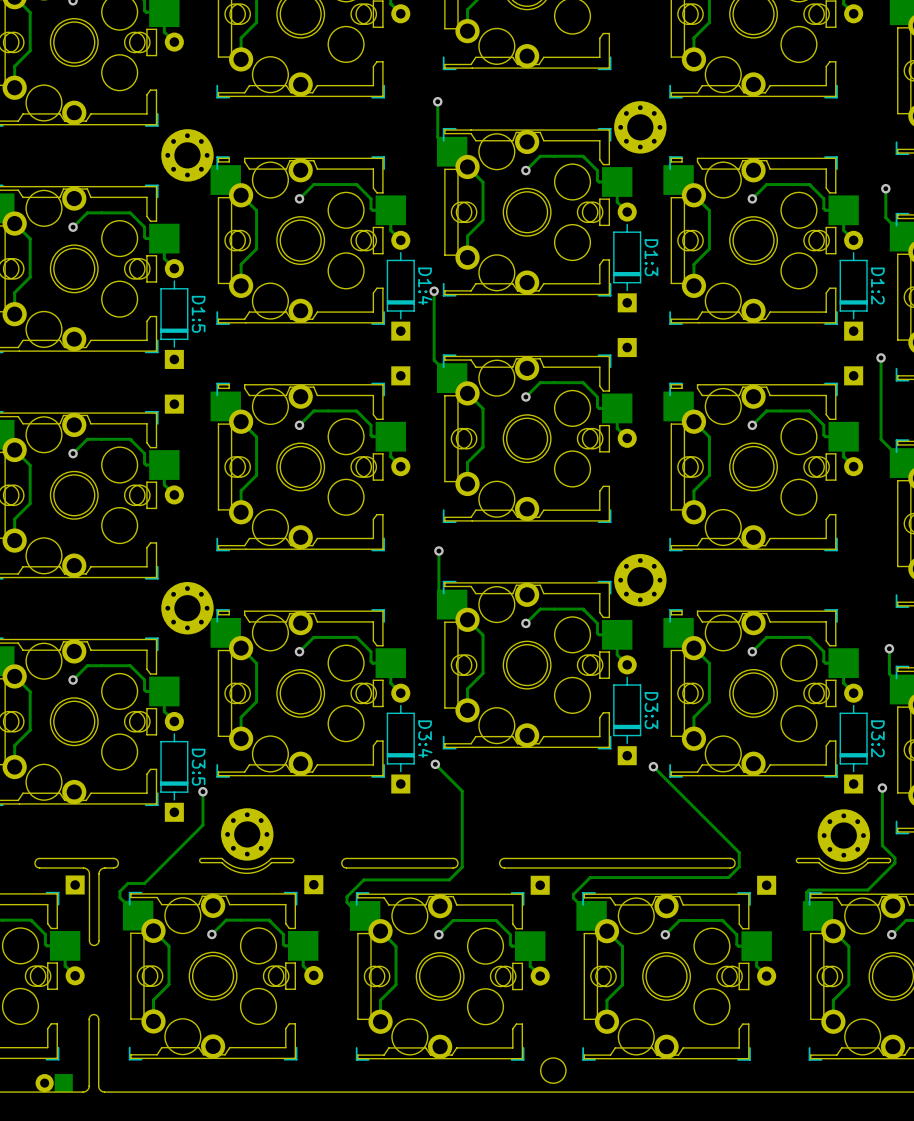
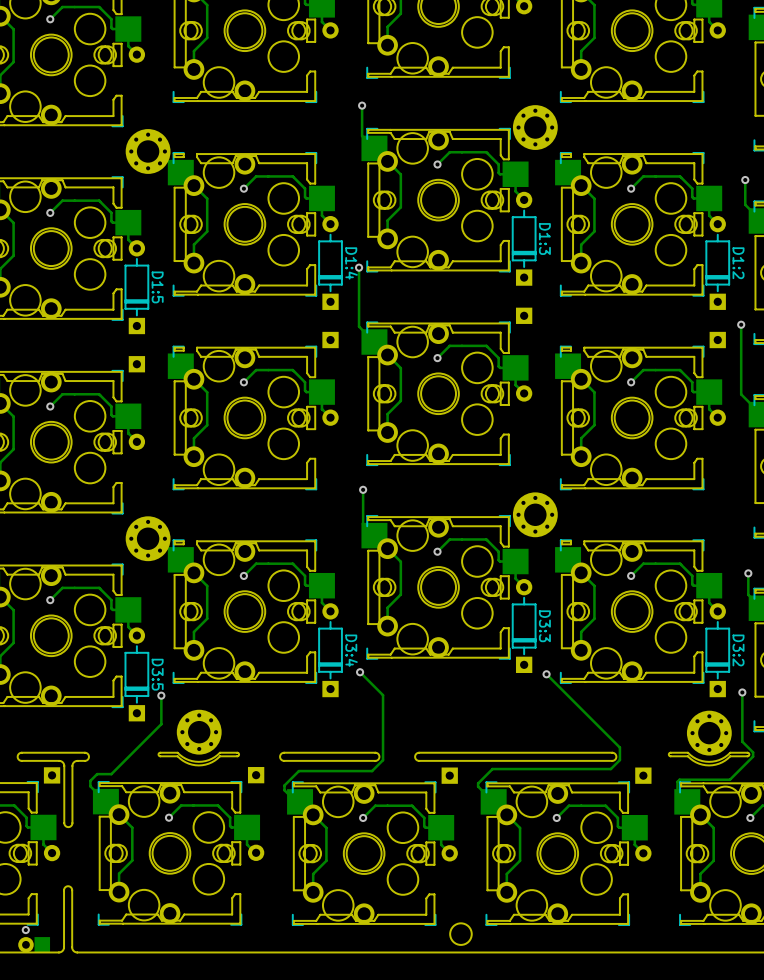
via: none -> (25, 930)

